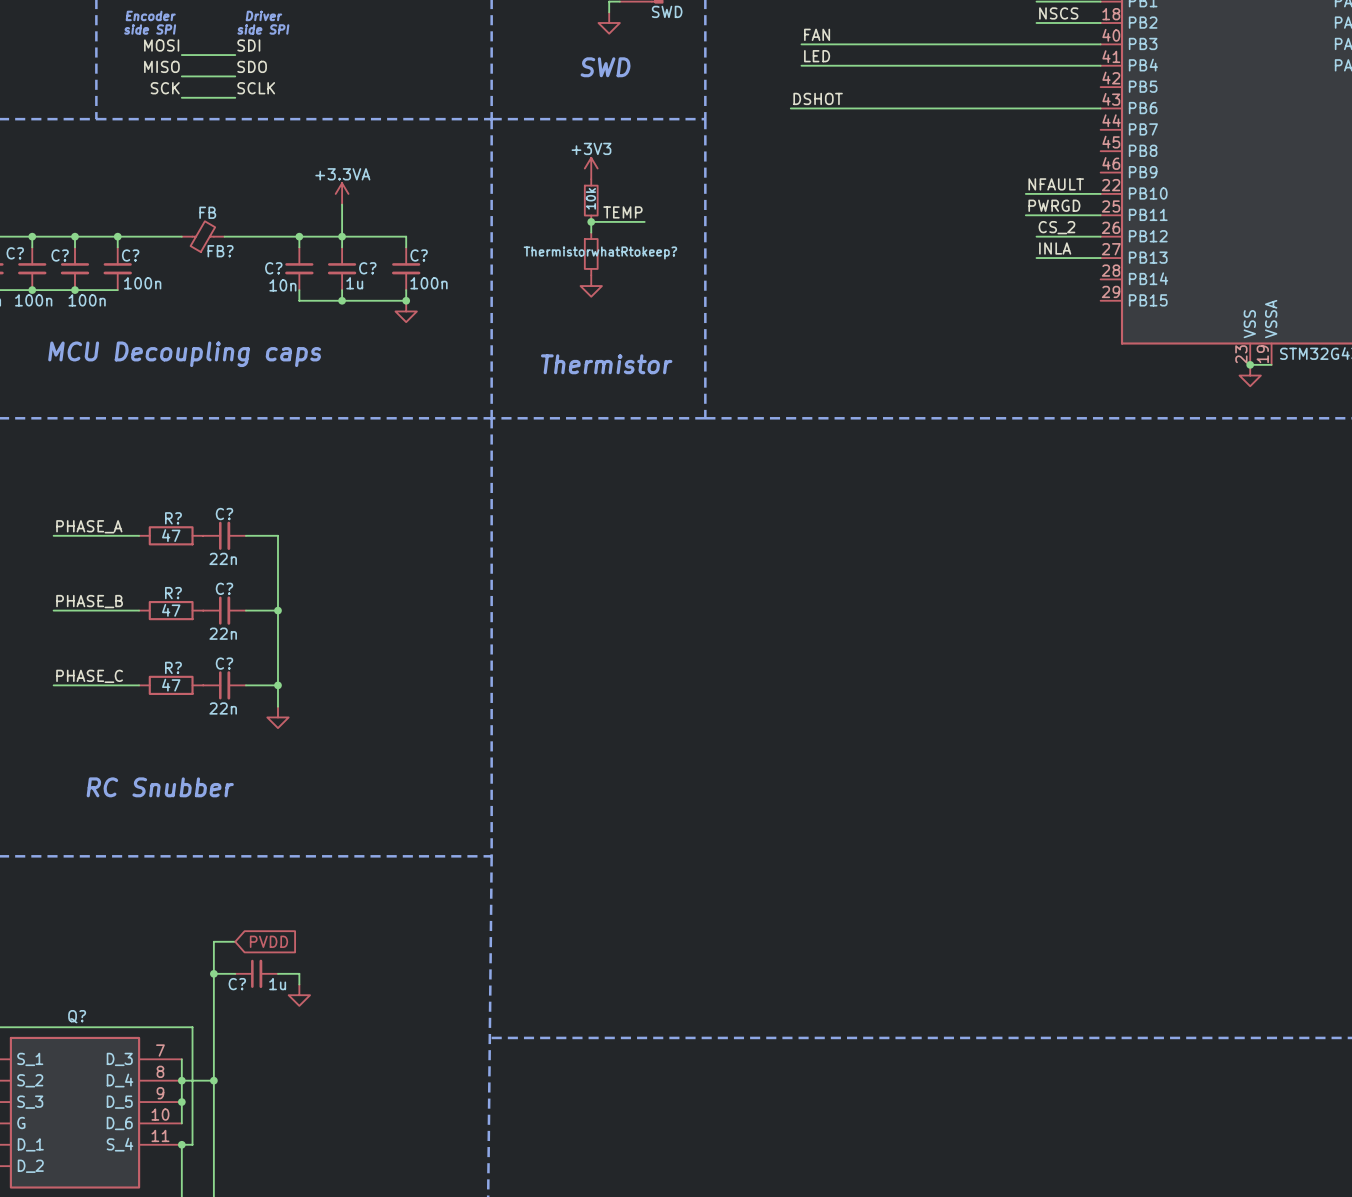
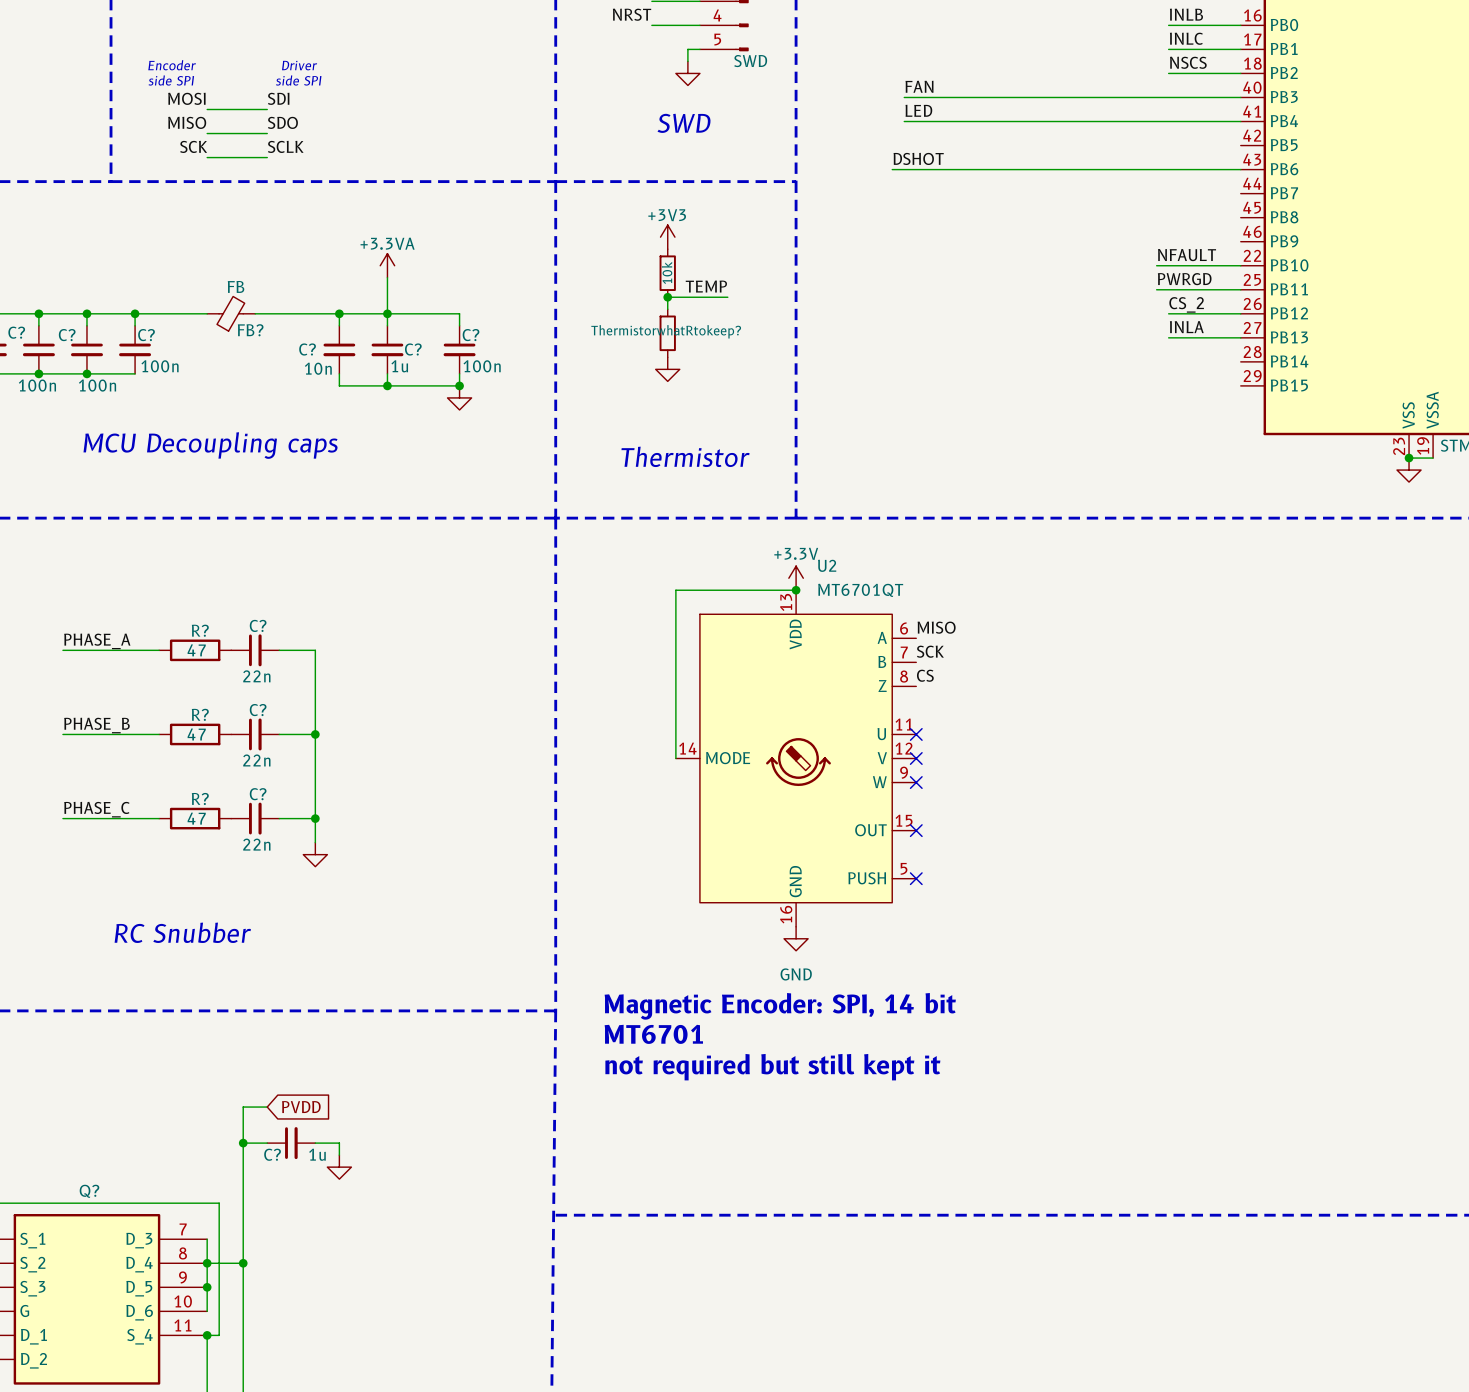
power symbol: none -> +3.3V (796, 578)
wire: none -> (796, 590) (675, 590) (675, 758)
junction: none -> (796, 590)
label: none -> MISO (936, 627)
label: none -> SCK (930, 651)
label: none -> CS (925, 675)
no-connect mark: none -> (916, 734)
U2: none -> MT6701QT (796, 758)
no-connect mark: none -> (916, 758)
no-connect mark: none -> (916, 782)
no-connect mark: none -> (916, 830)
no-connect mark: none -> (916, 878)
power symbol: none -> GND (796, 938)
text: none -> Magnetic Encoder: SPI, 14 bit (780, 1006)
text: none -> MT6701 (653, 1034)
text: none -> not required but still kept it (772, 1067)

